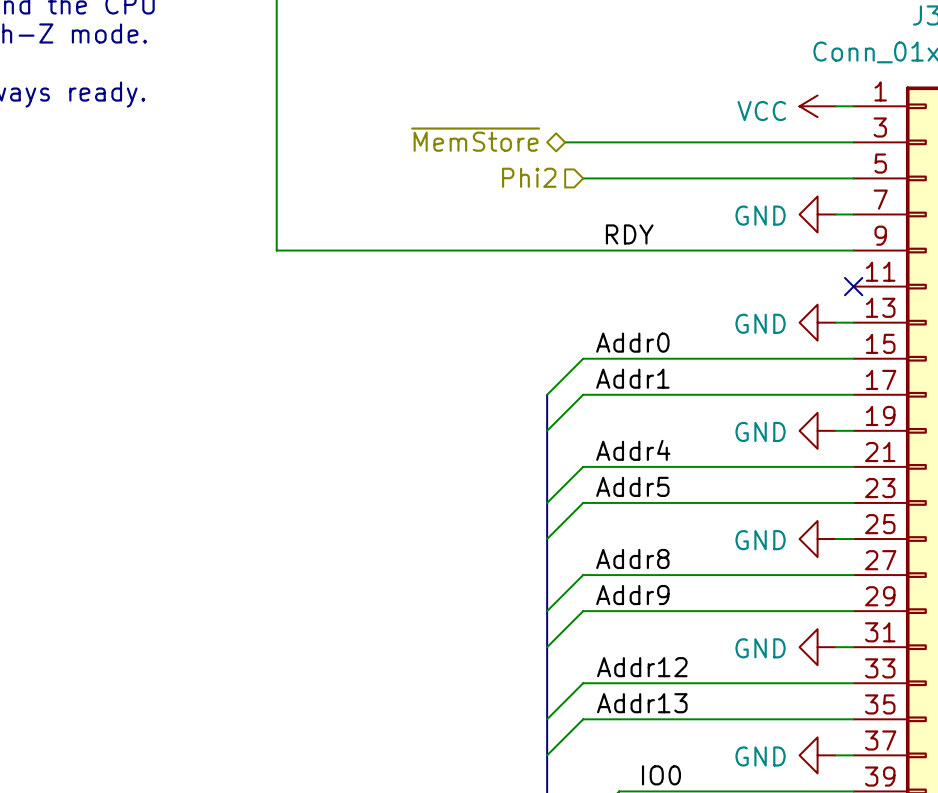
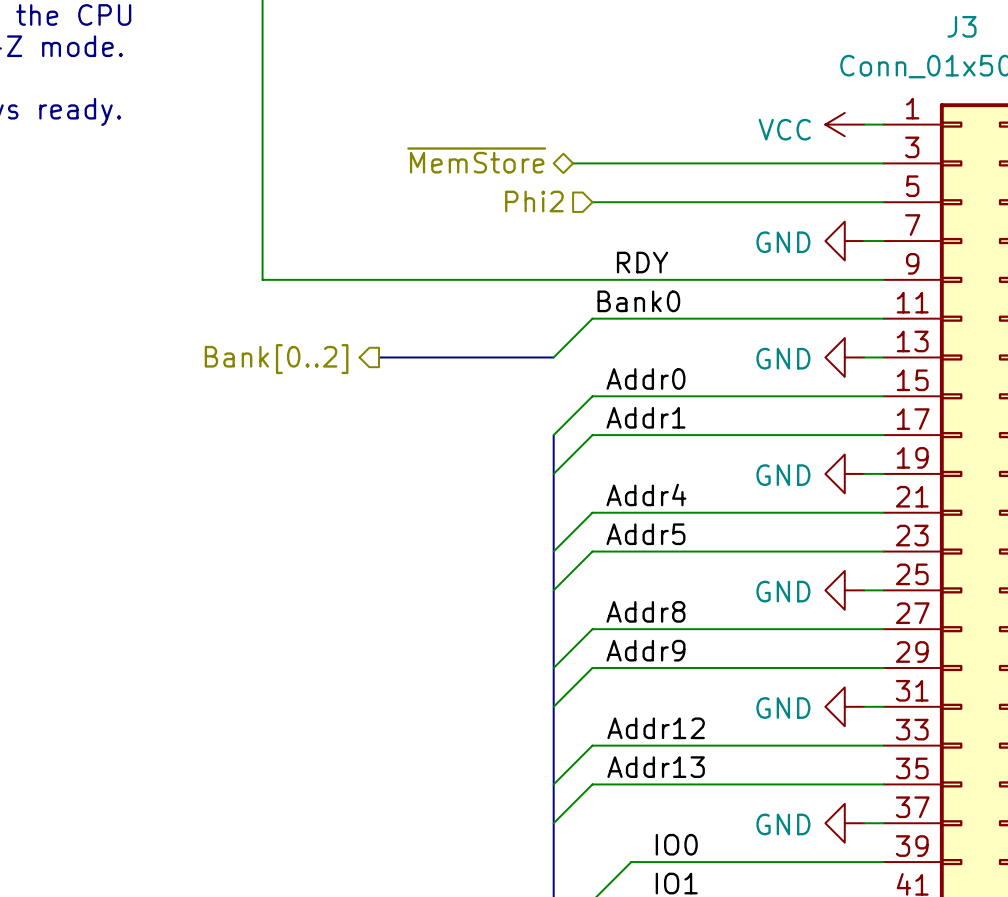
label: none -> Bank0 (638, 301)
wire: none -> (883, 318) (592, 318) (553, 357)
no-connect mark: (853, 286) -> none
bus: none -> (379, 357) (553, 357)
hierarchical label: none -> Bank[0..2] (276, 359)

